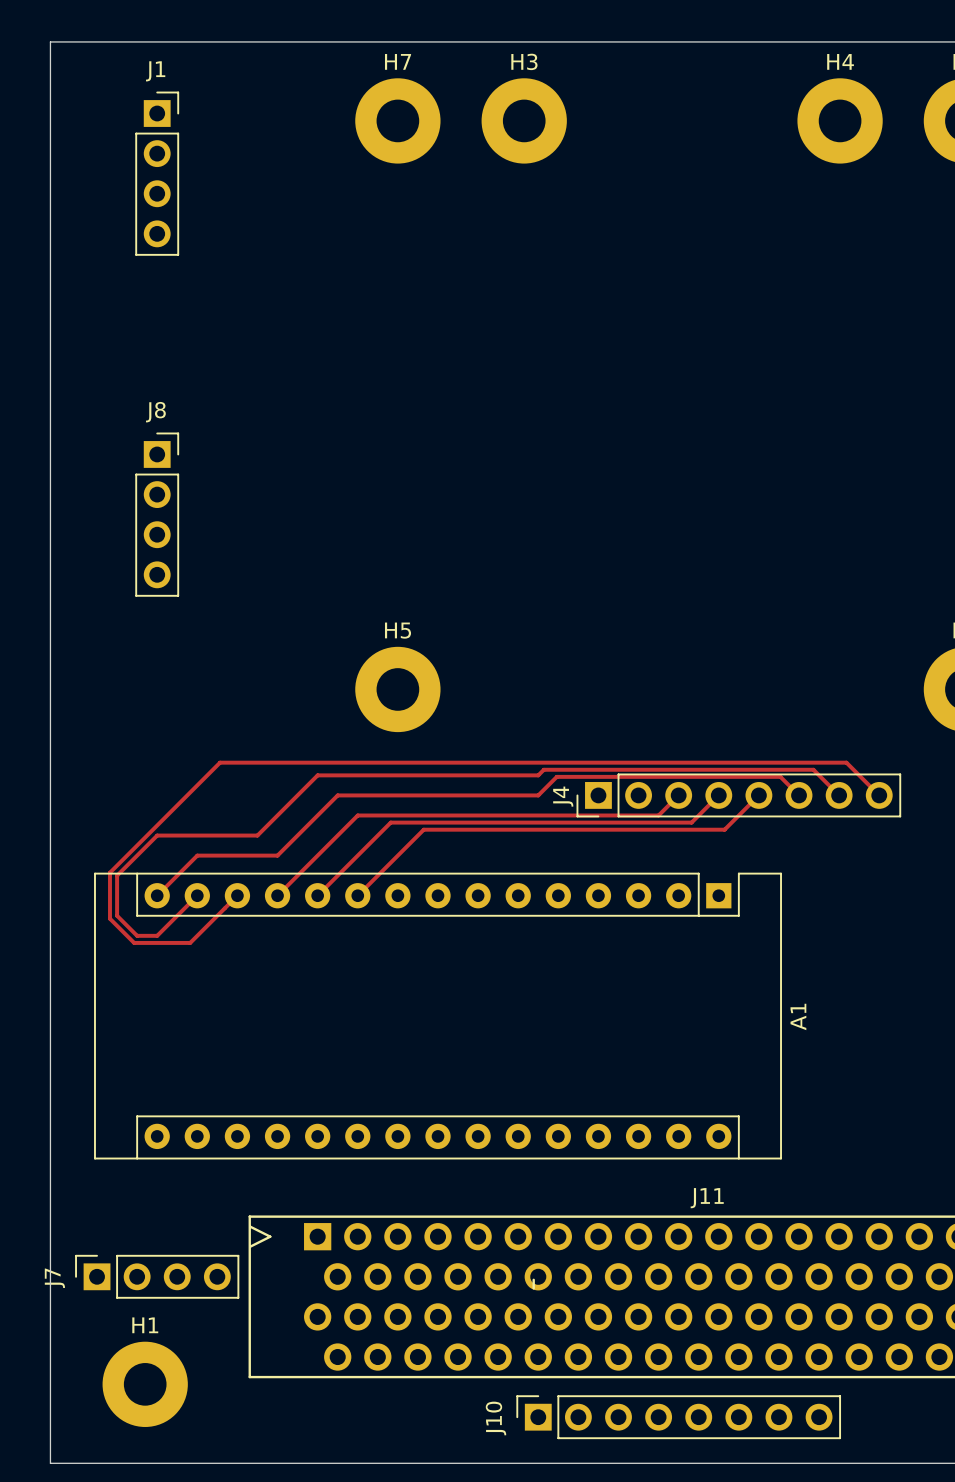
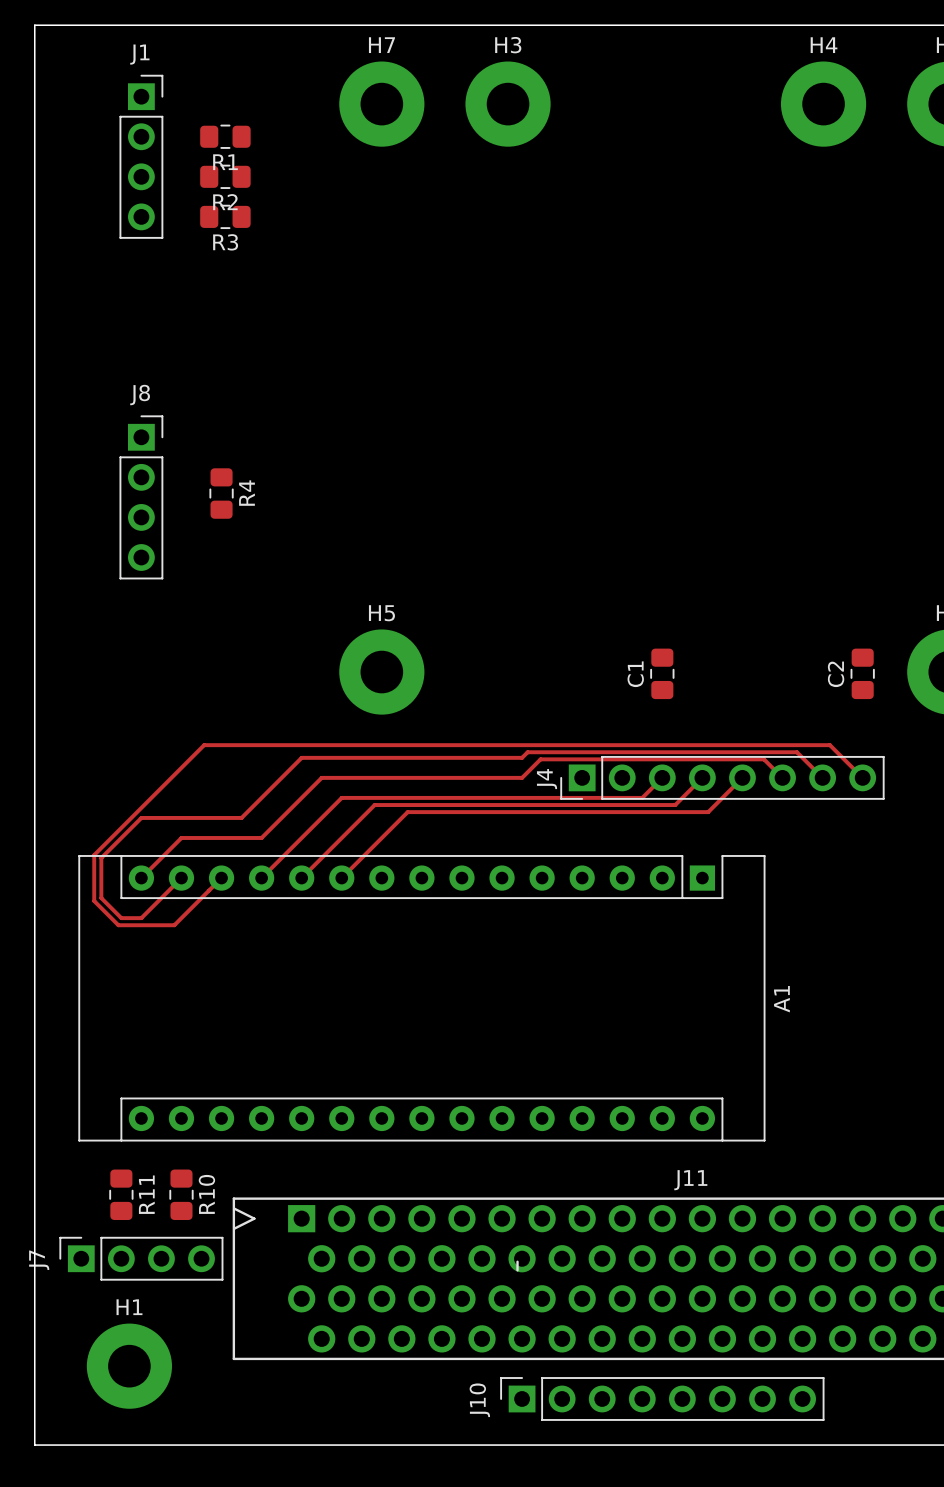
R1: none -> (225, 136)
R2: none -> (225, 176)
R3: none -> (225, 216)
R4: none -> (221, 493)
C1: none -> (662, 673)
C2: none -> (862, 673)
R11: none -> (121, 1194)
R10: none -> (181, 1194)

